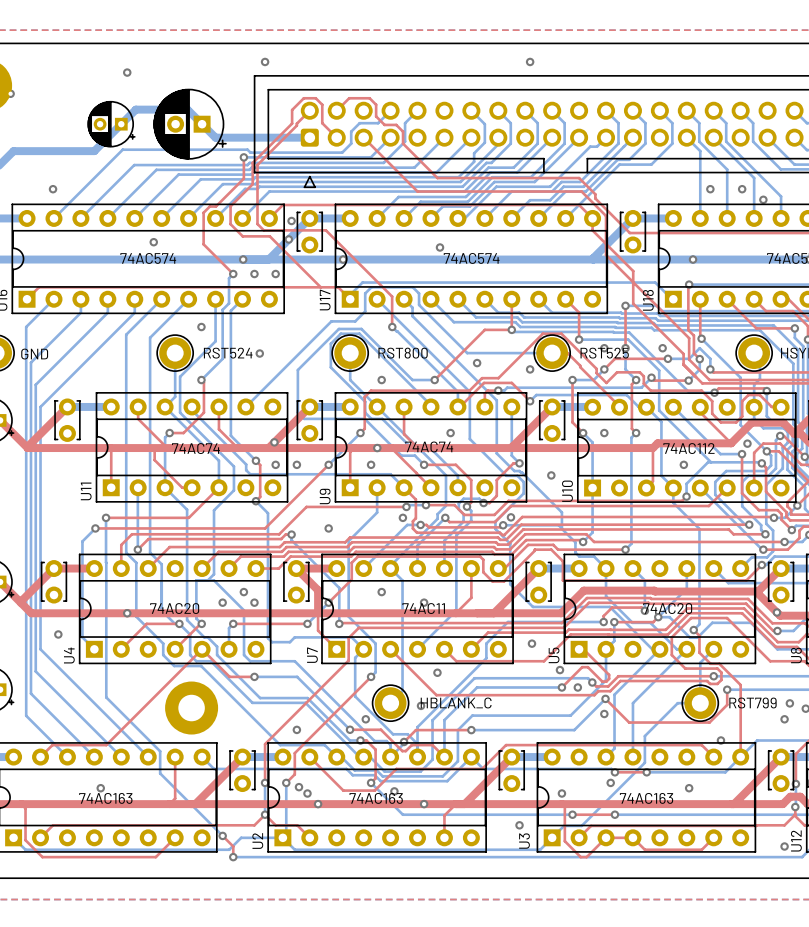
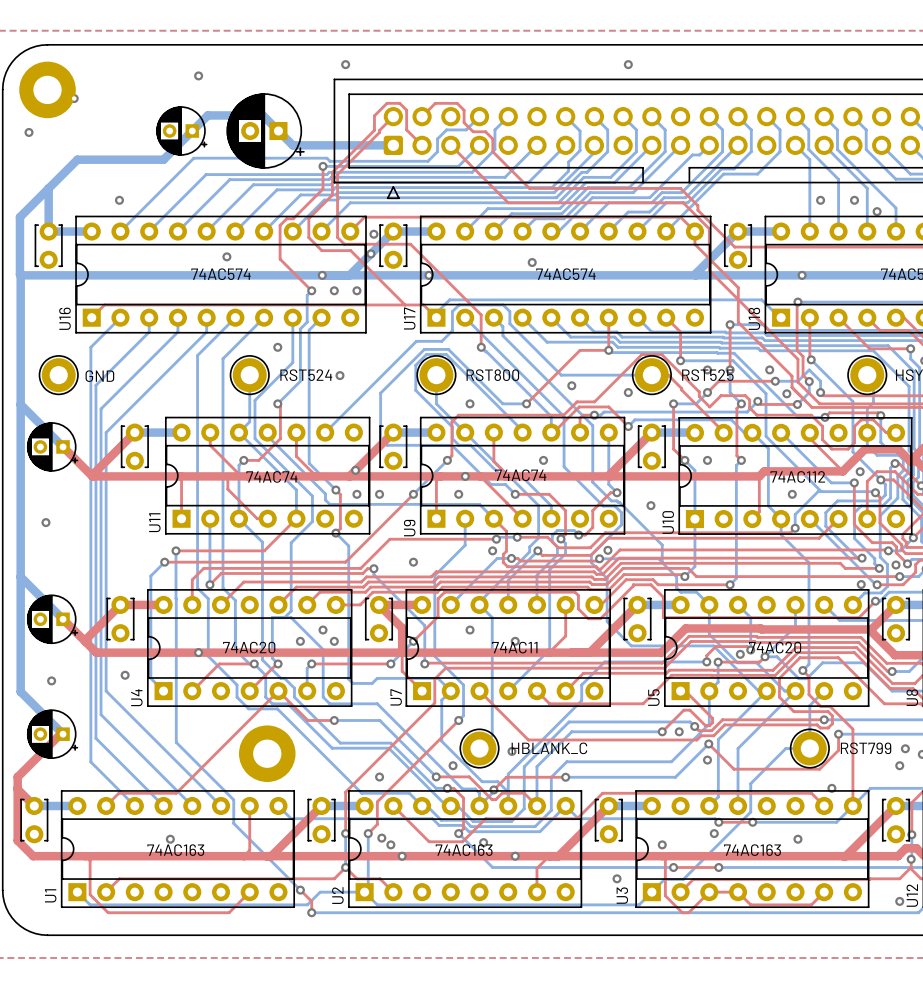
via: none -> (786, 393)
via: none -> (896, 565)
via: none -> (861, 584)
via: (776, 612) -> none
via: none -> (740, 654)
via: (531, 643) -> none
via: (559, 670) -> none
via: (437, 672) -> none

